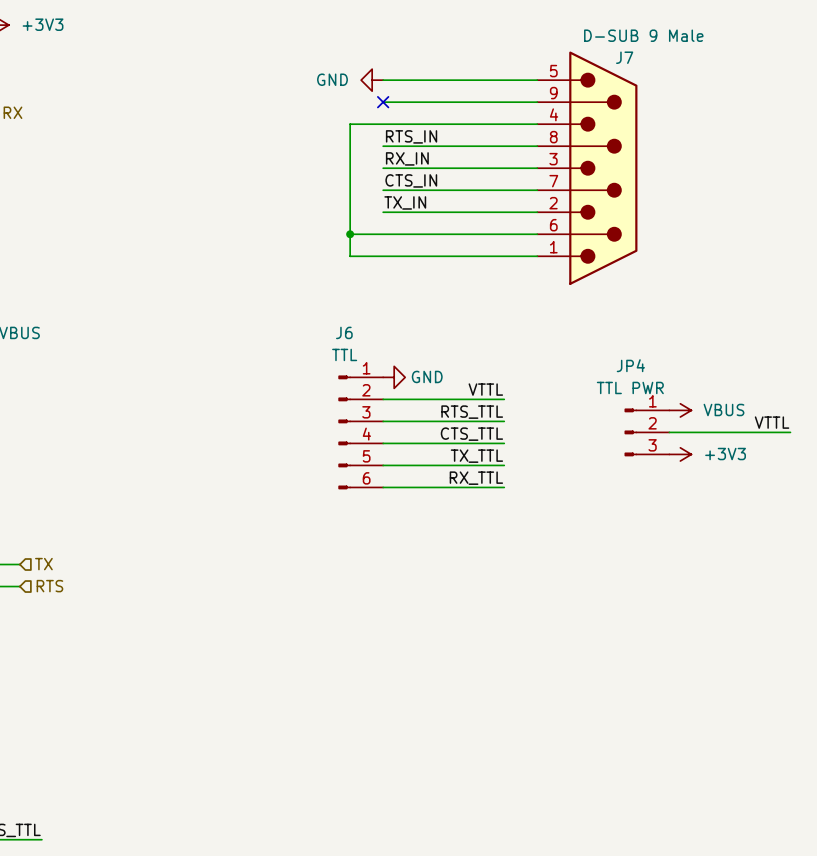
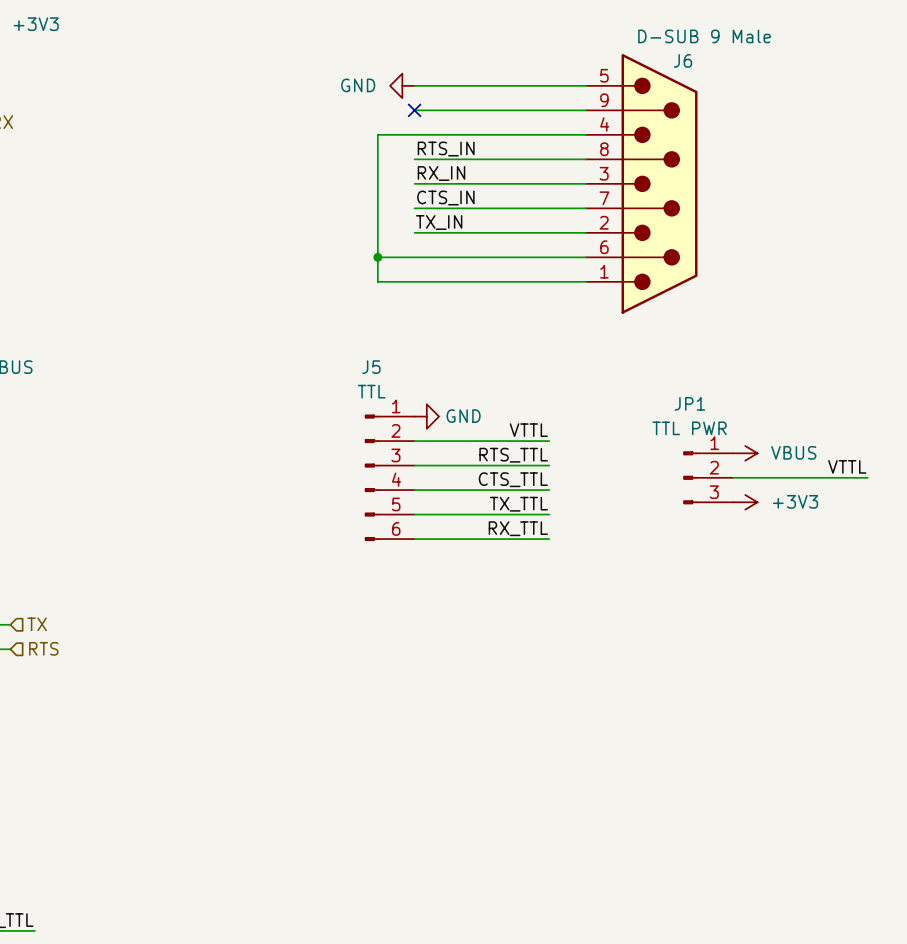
J7 name: J7 (624, 57) -> J6 (682, 60)
J6 name: J6 (344, 332) -> J5 (371, 367)
JP4 name: JP4 (630, 365) -> JP1 (689, 403)

